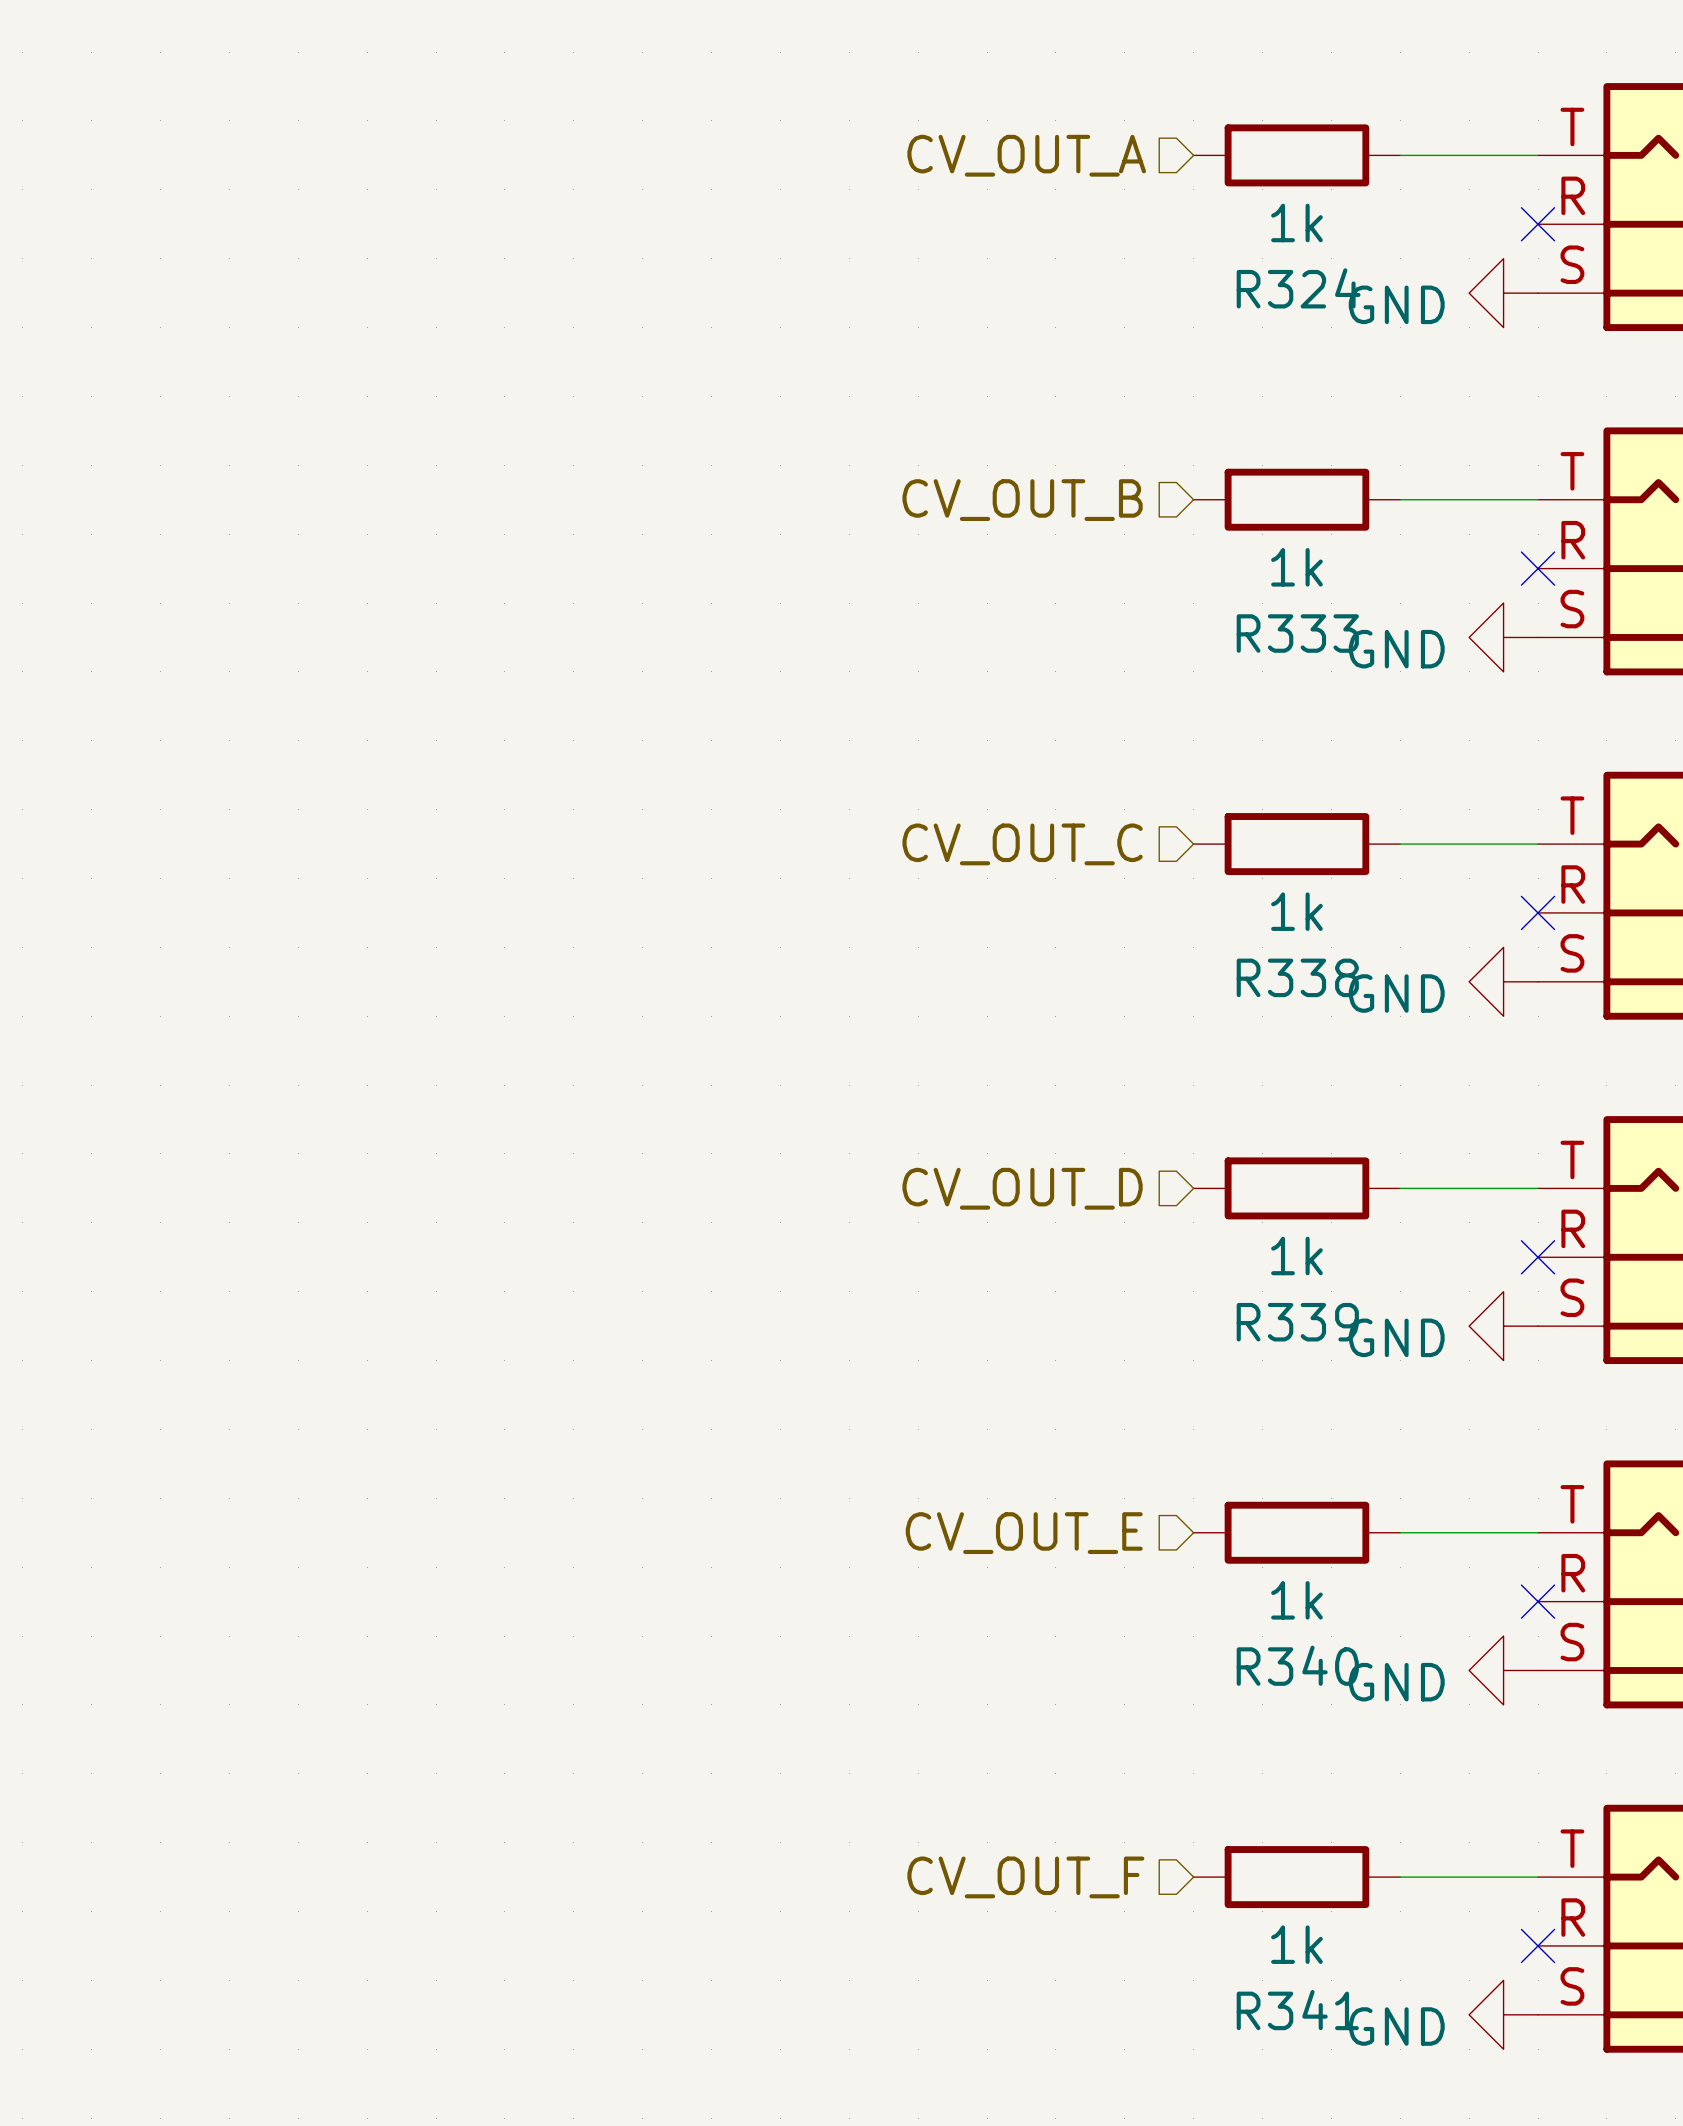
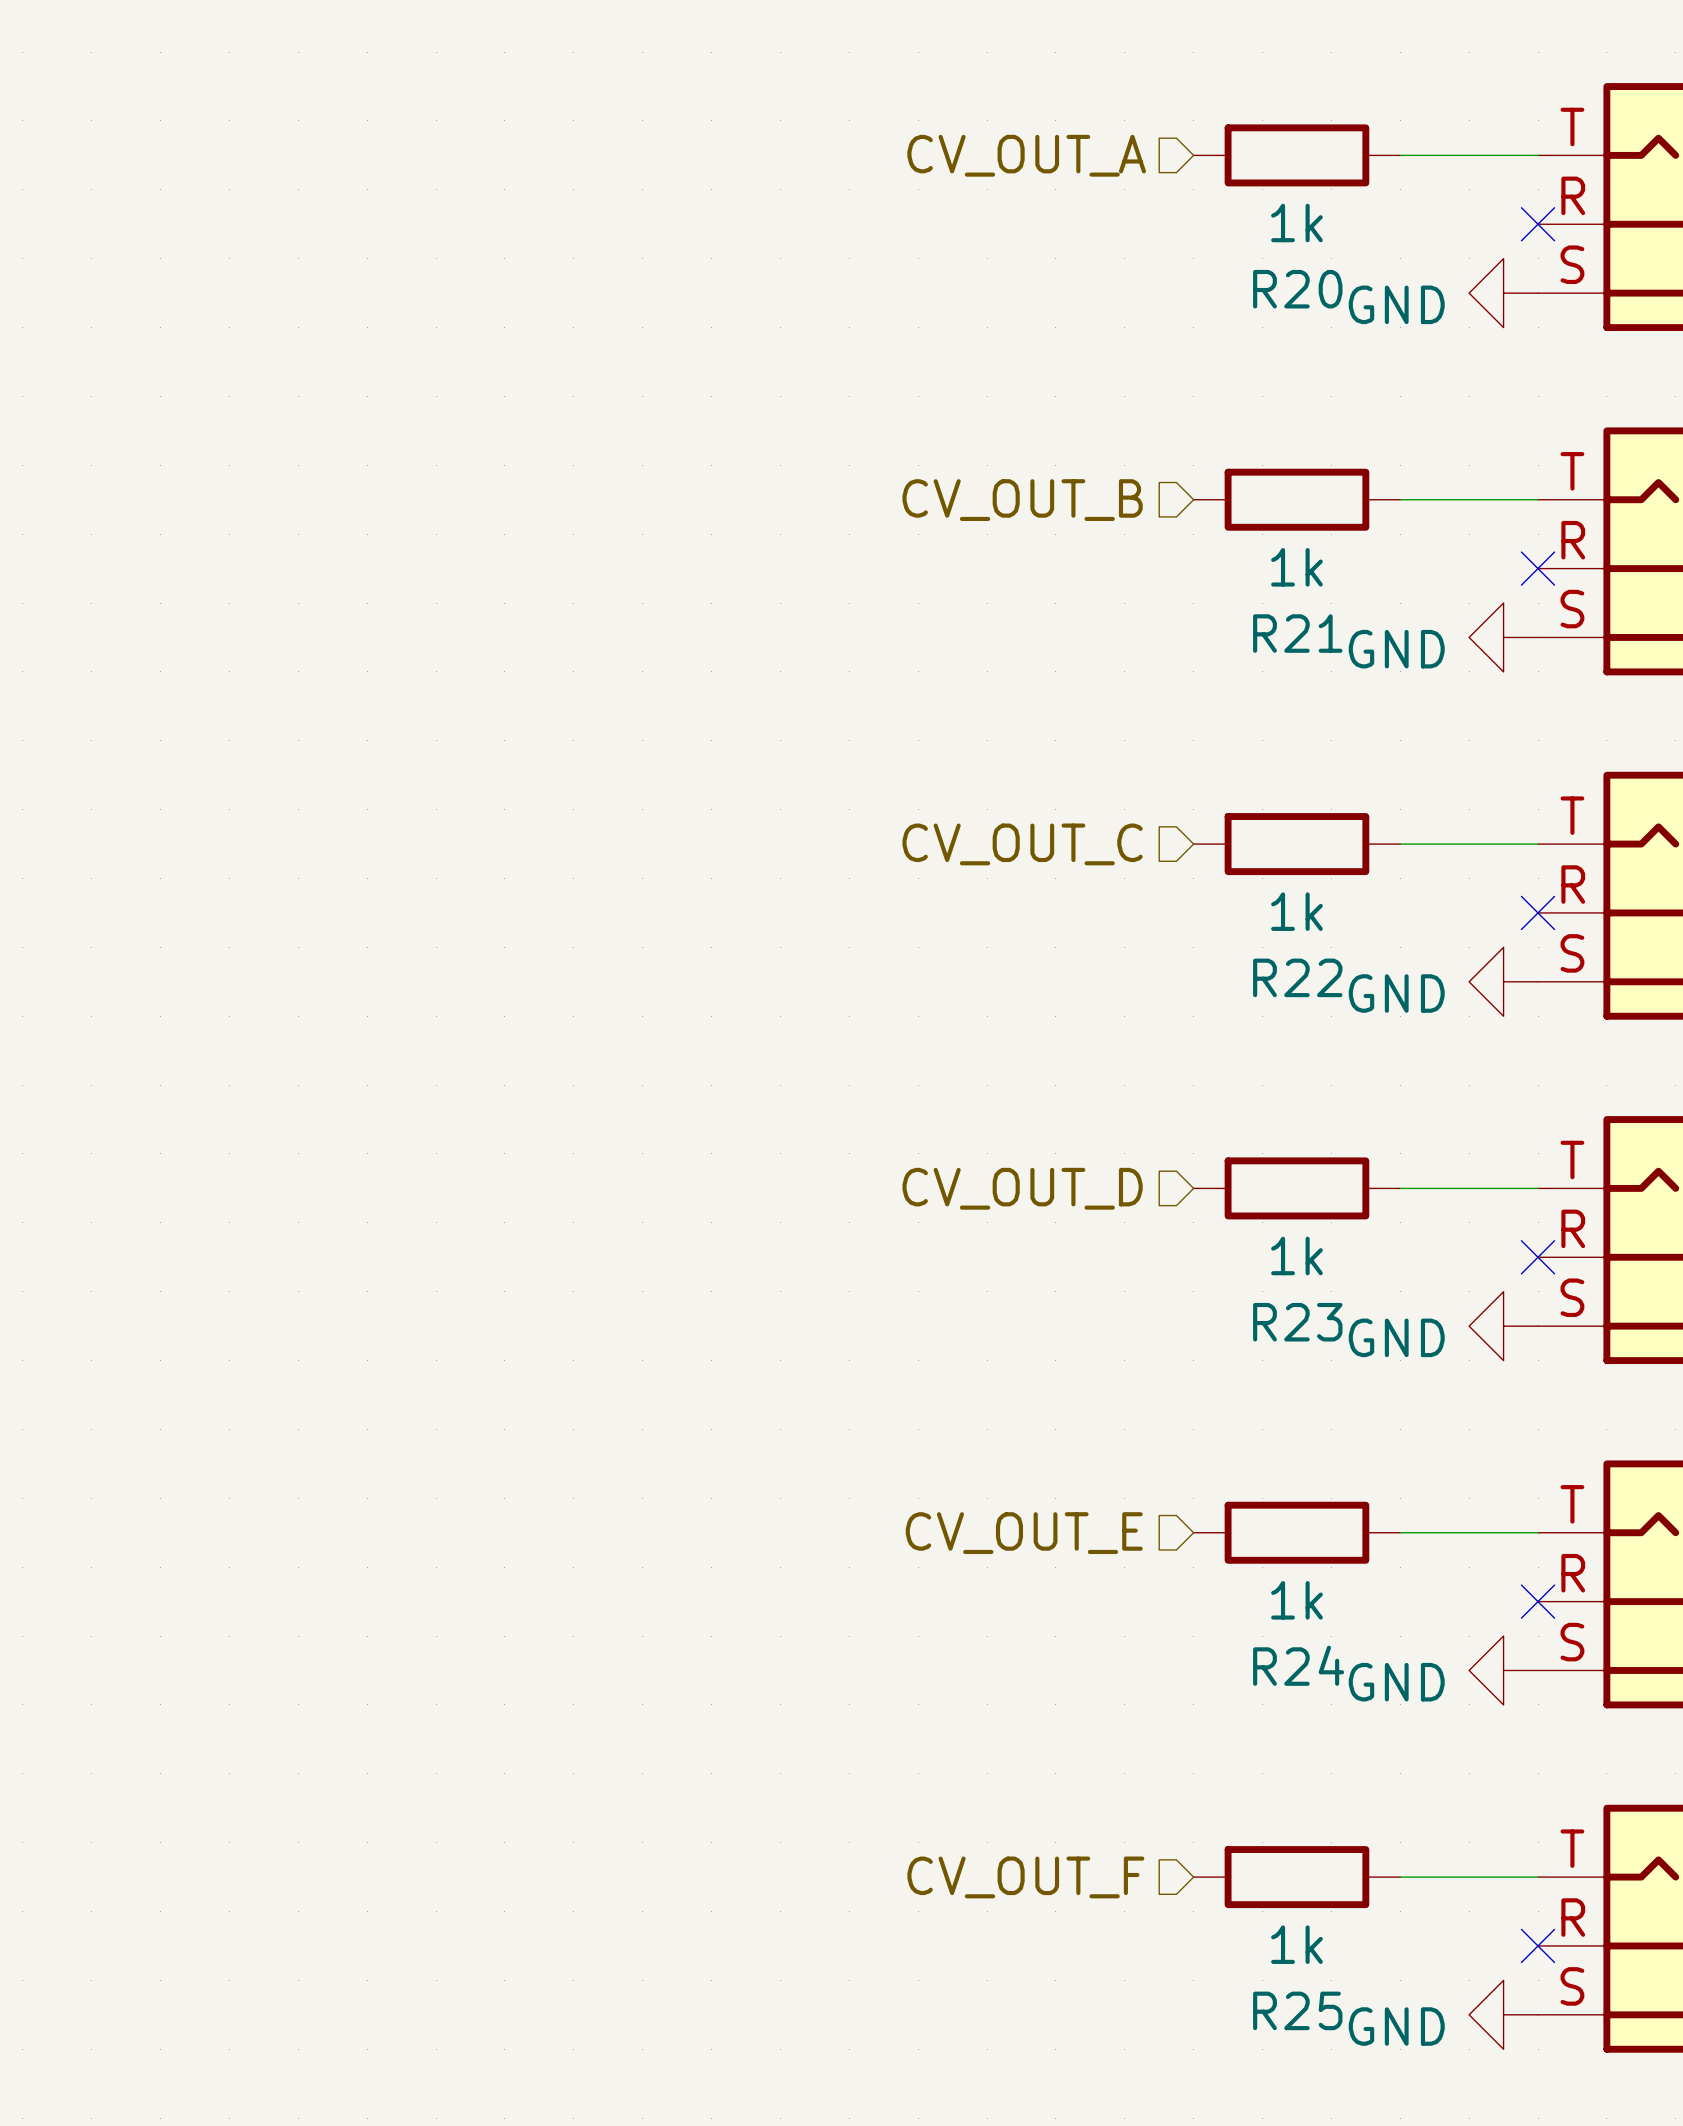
R324 name: R324 (1298, 288) -> R20 (1297, 289)
R333 name: R333 (1297, 633) -> R21 (1297, 633)
R338 name: R338 (1297, 977) -> R22 (1297, 977)
R339 name: R339 (1297, 1322) -> R23 (1297, 1322)
R340 name: R340 (1297, 1665) -> R24 (1298, 1665)
R341 name: R341 (1297, 2010) -> R25 (1297, 2010)

